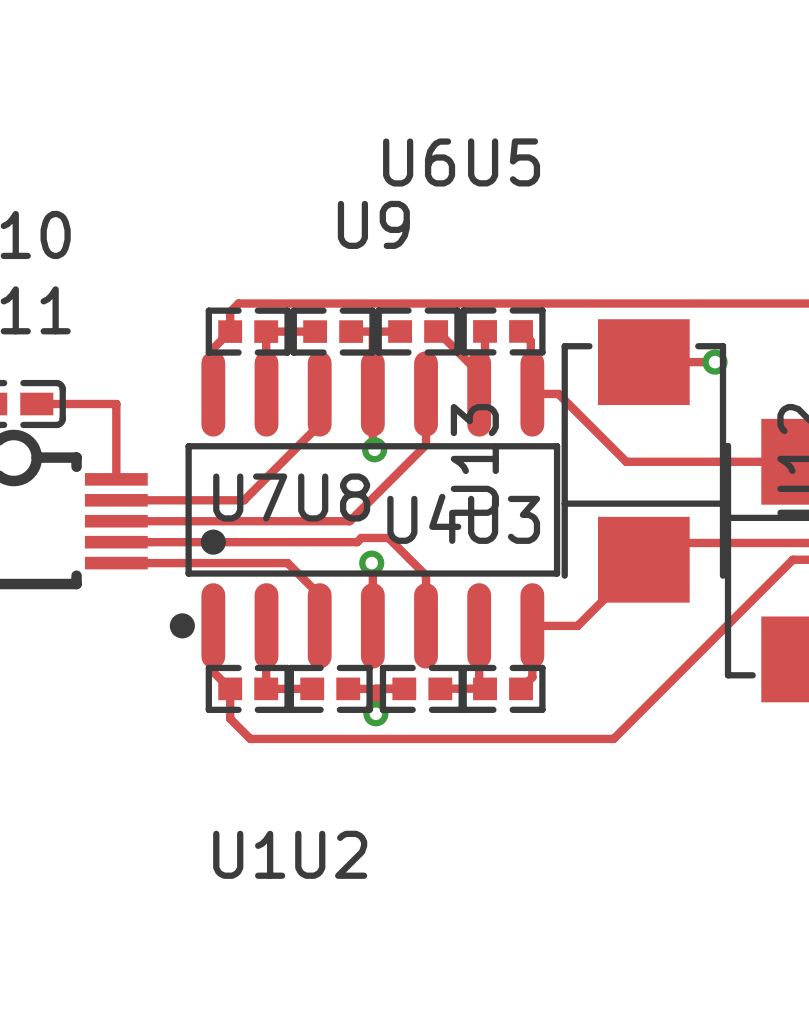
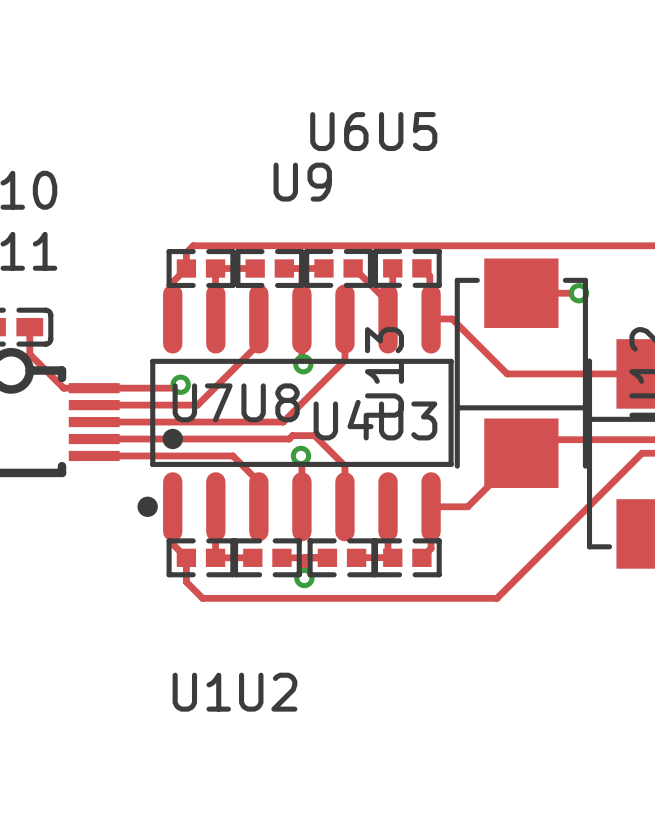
top track: (36, 404) (116, 404) (116, 479) -> (29, 327) (29, 354) (63, 388) (90, 388)
top track: none -> (180, 384) (177, 388) (94, 388)
via: none -> (180, 384)

